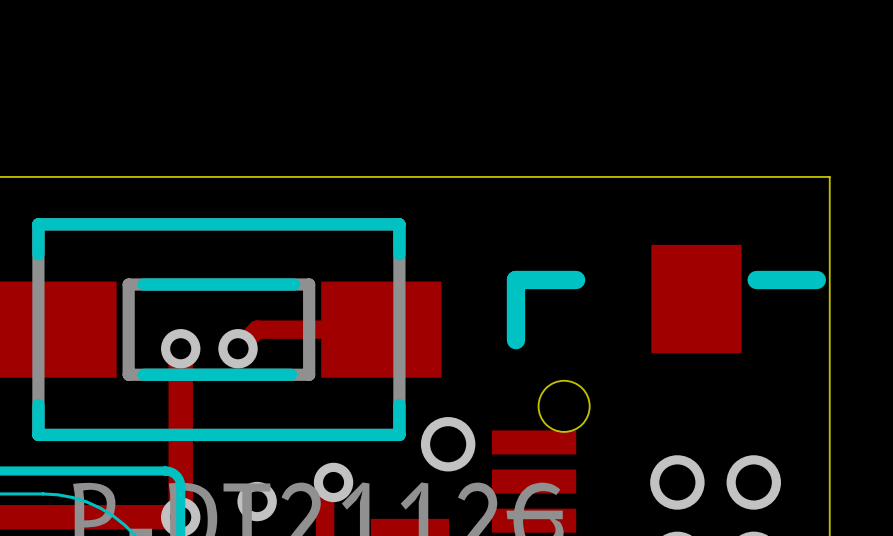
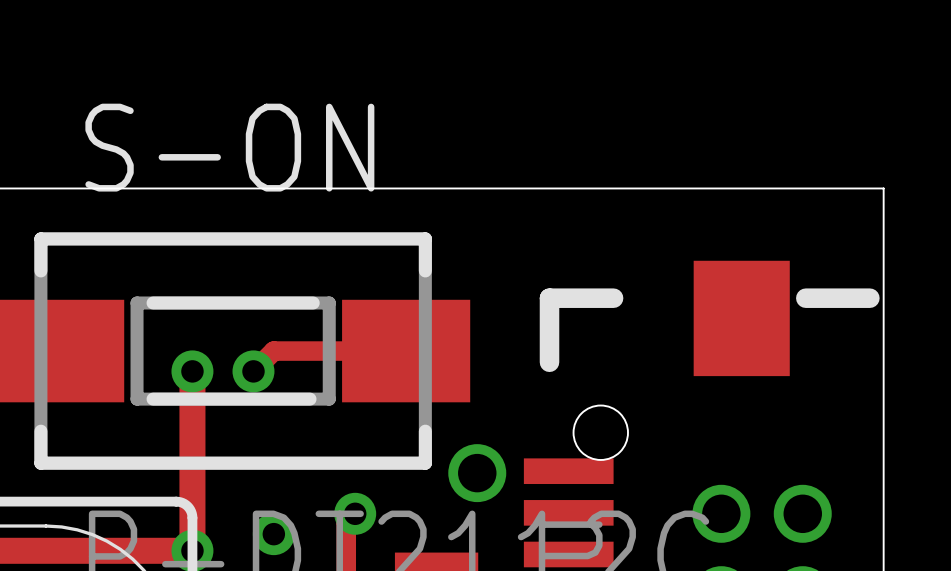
S-ON name: none -> S-ON (229, 147)

